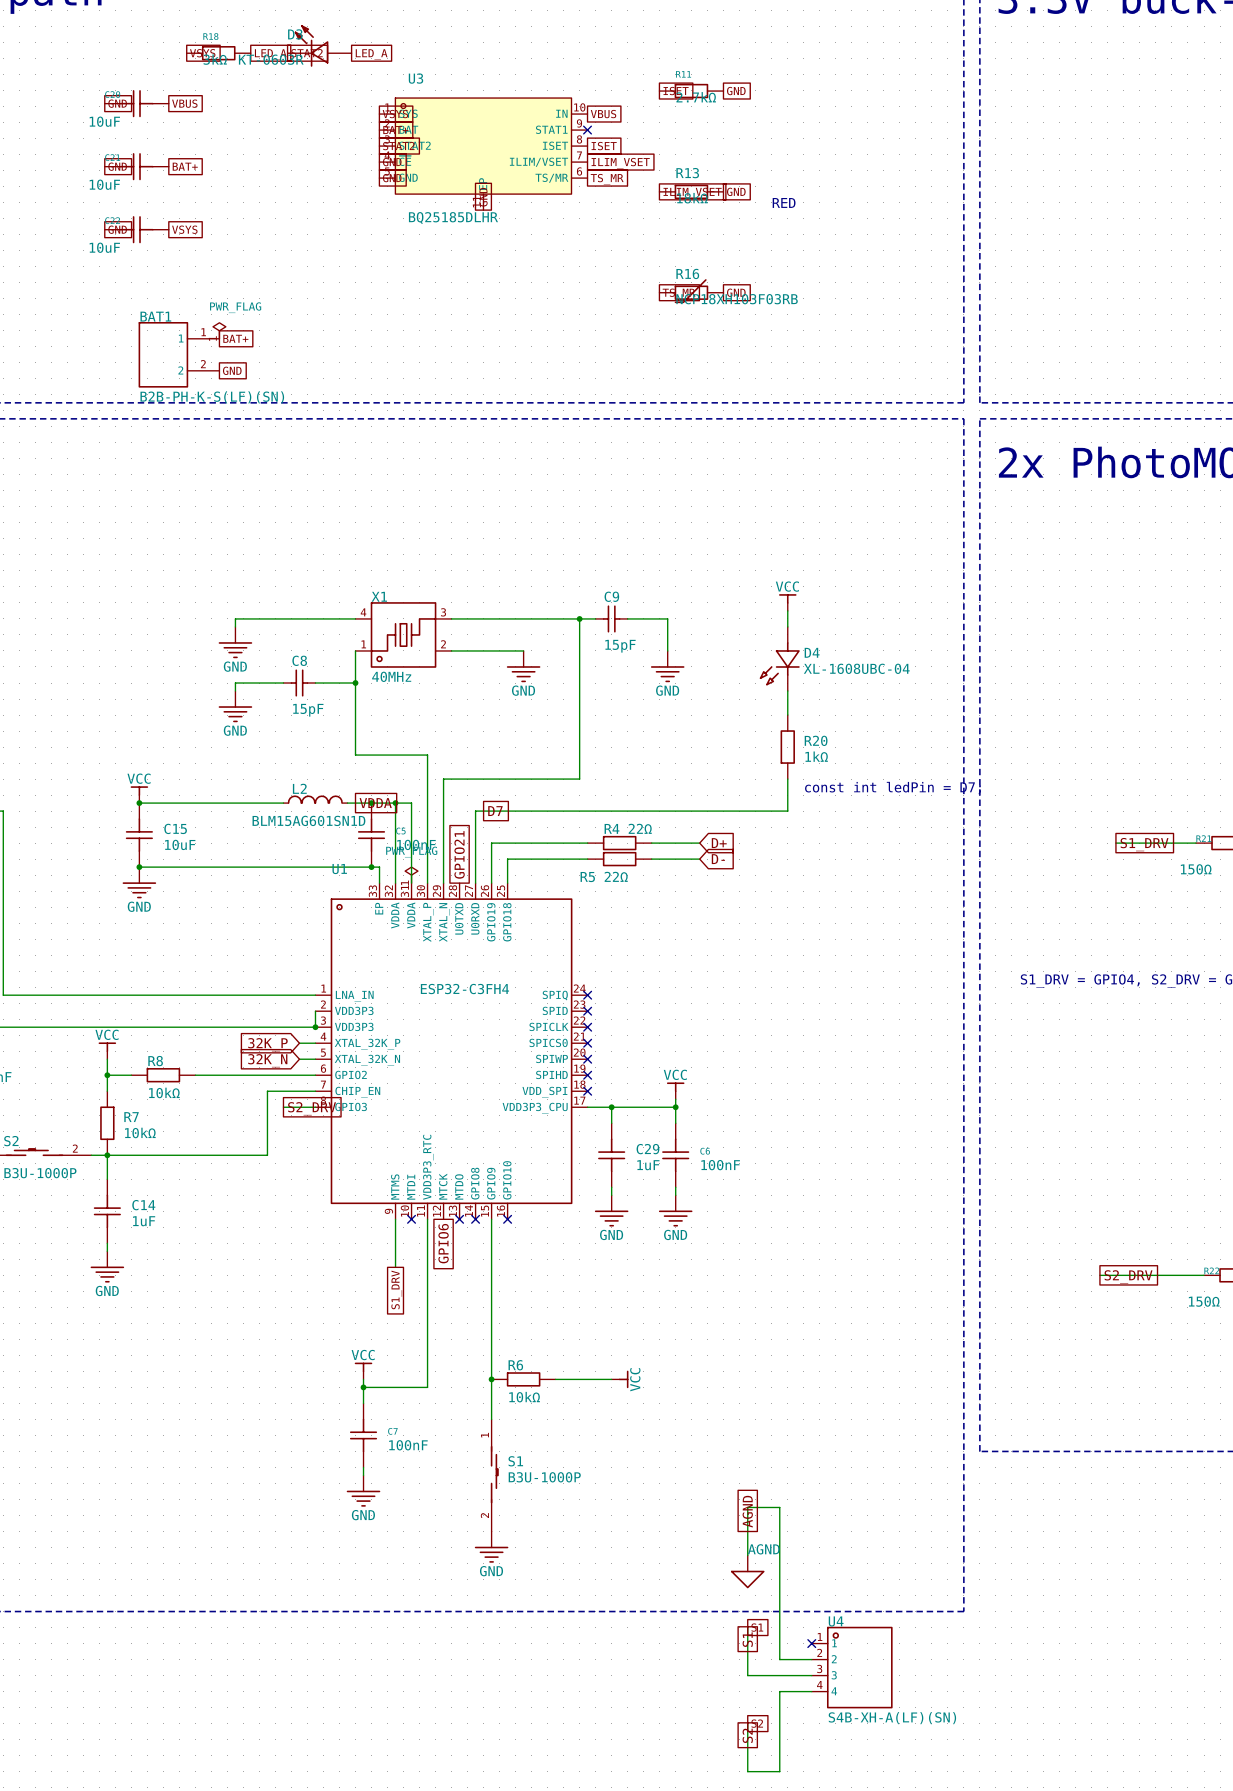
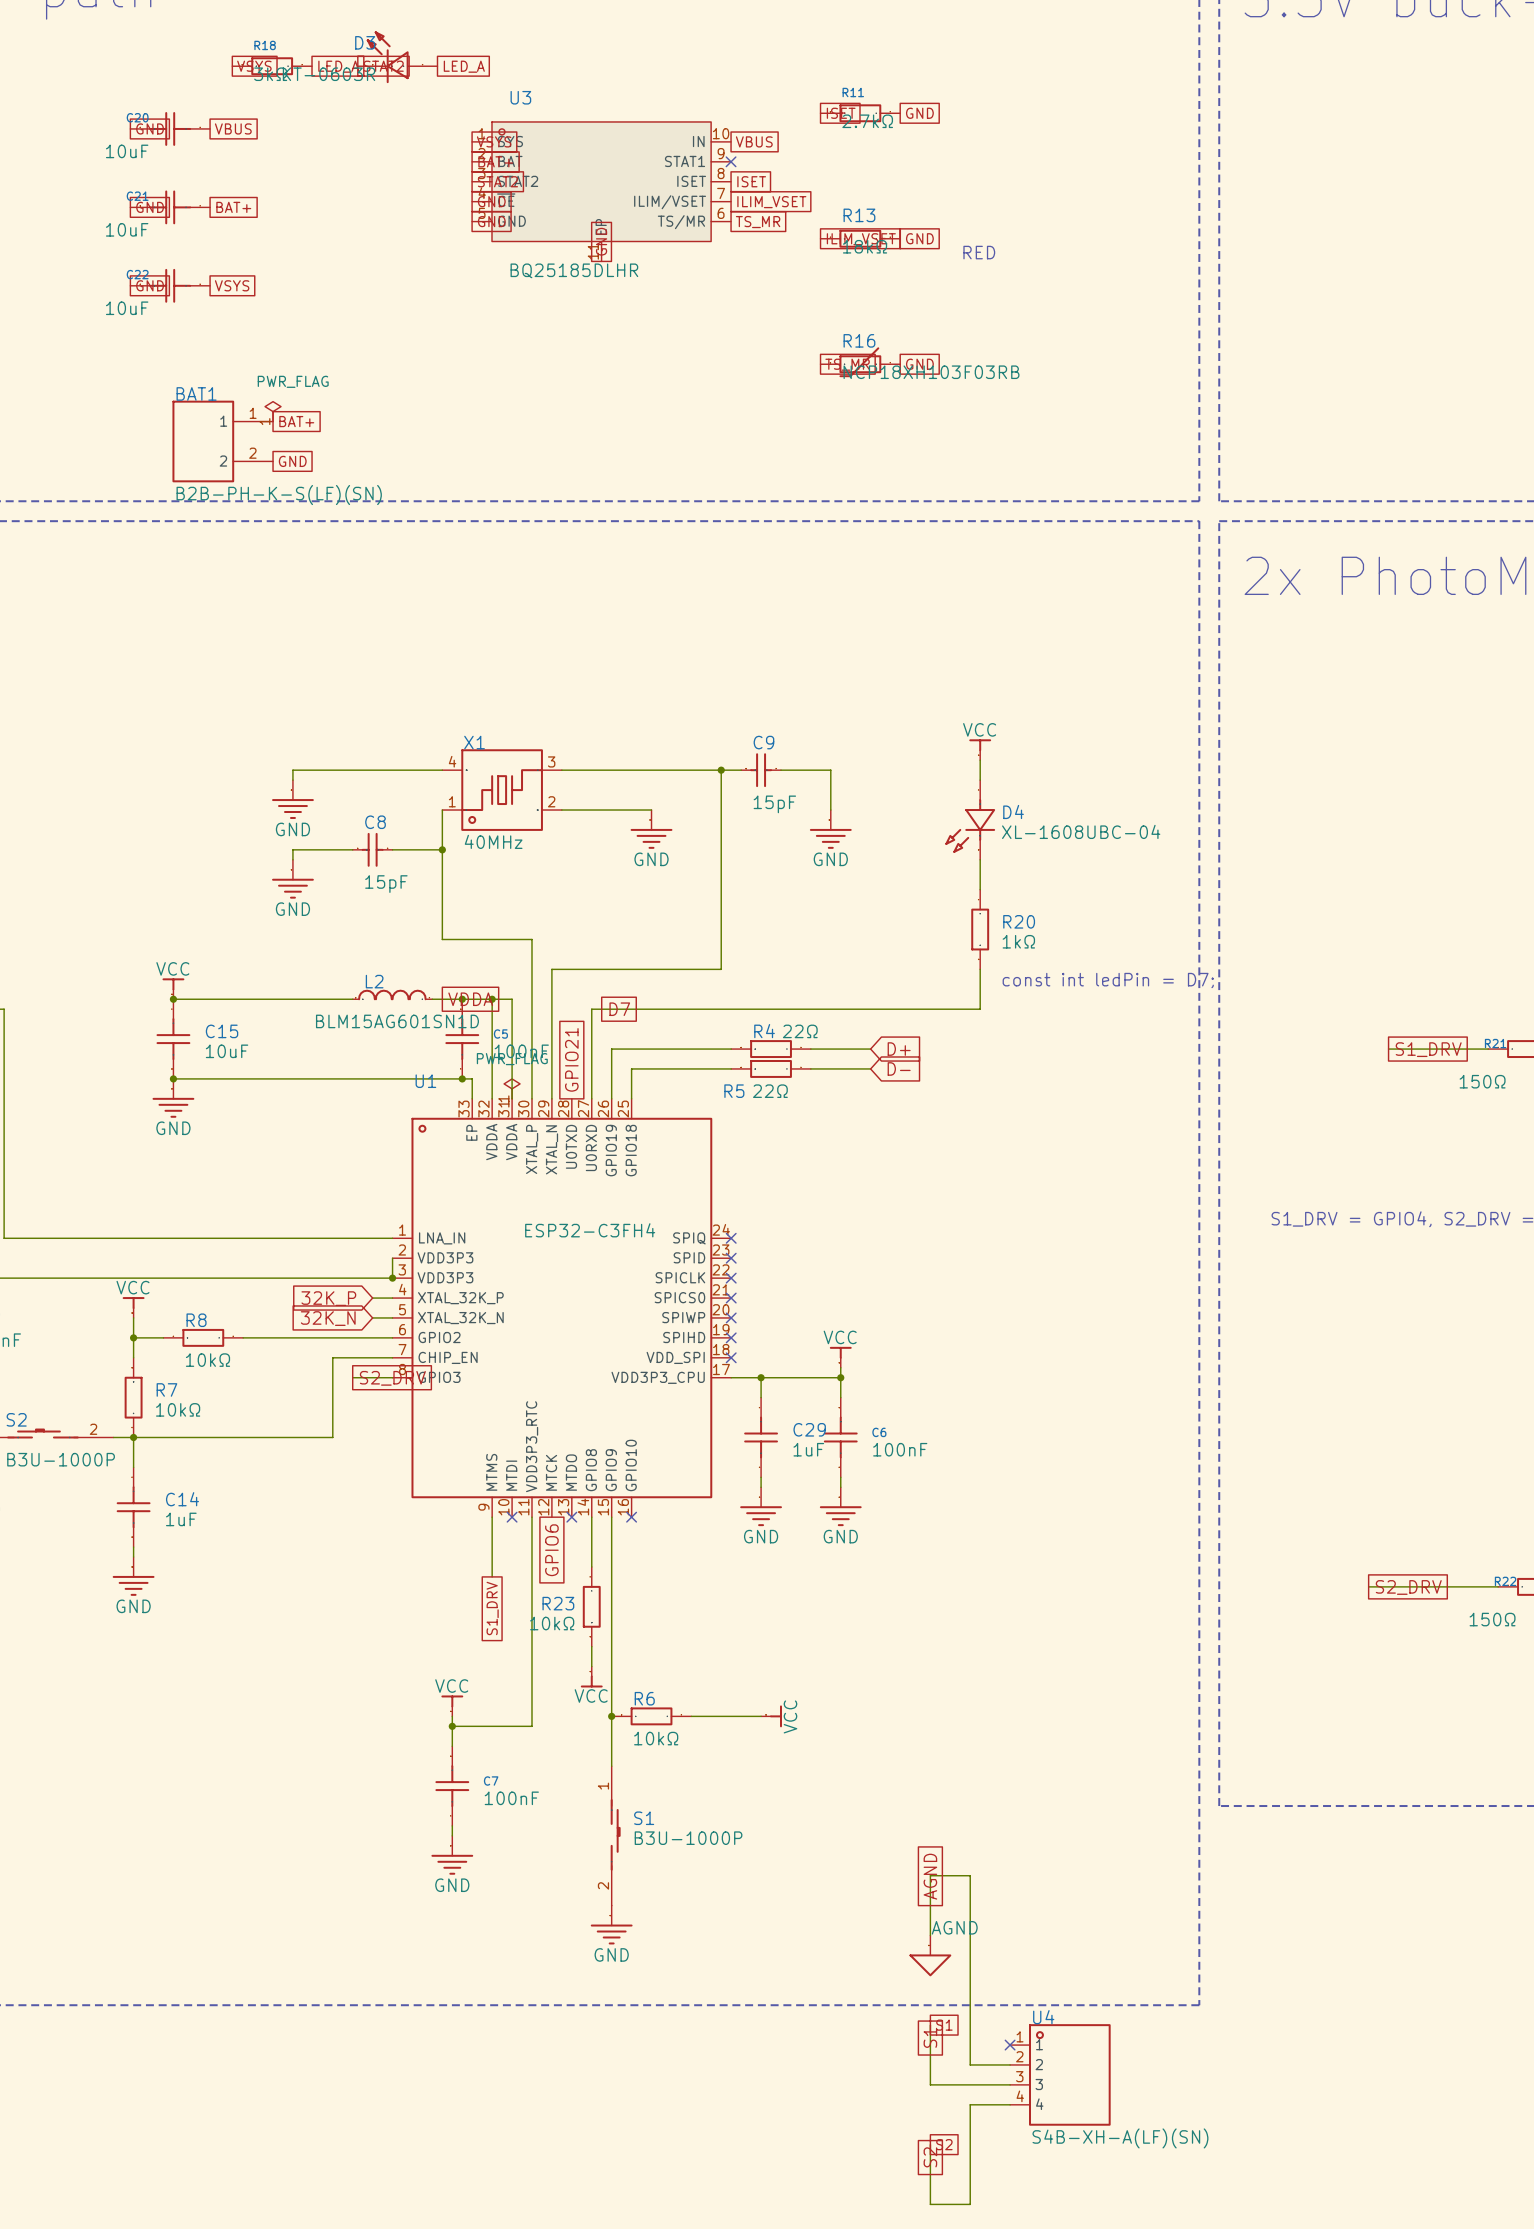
wire: none -> (591, 1517) (591, 1566)
no-connect mark: (475, 1219) -> none
R23: none -> 10kΩ (591, 1606)
wire: none -> (591, 1646) (591, 1666)
power symbol: none -> VCC (591, 1677)

